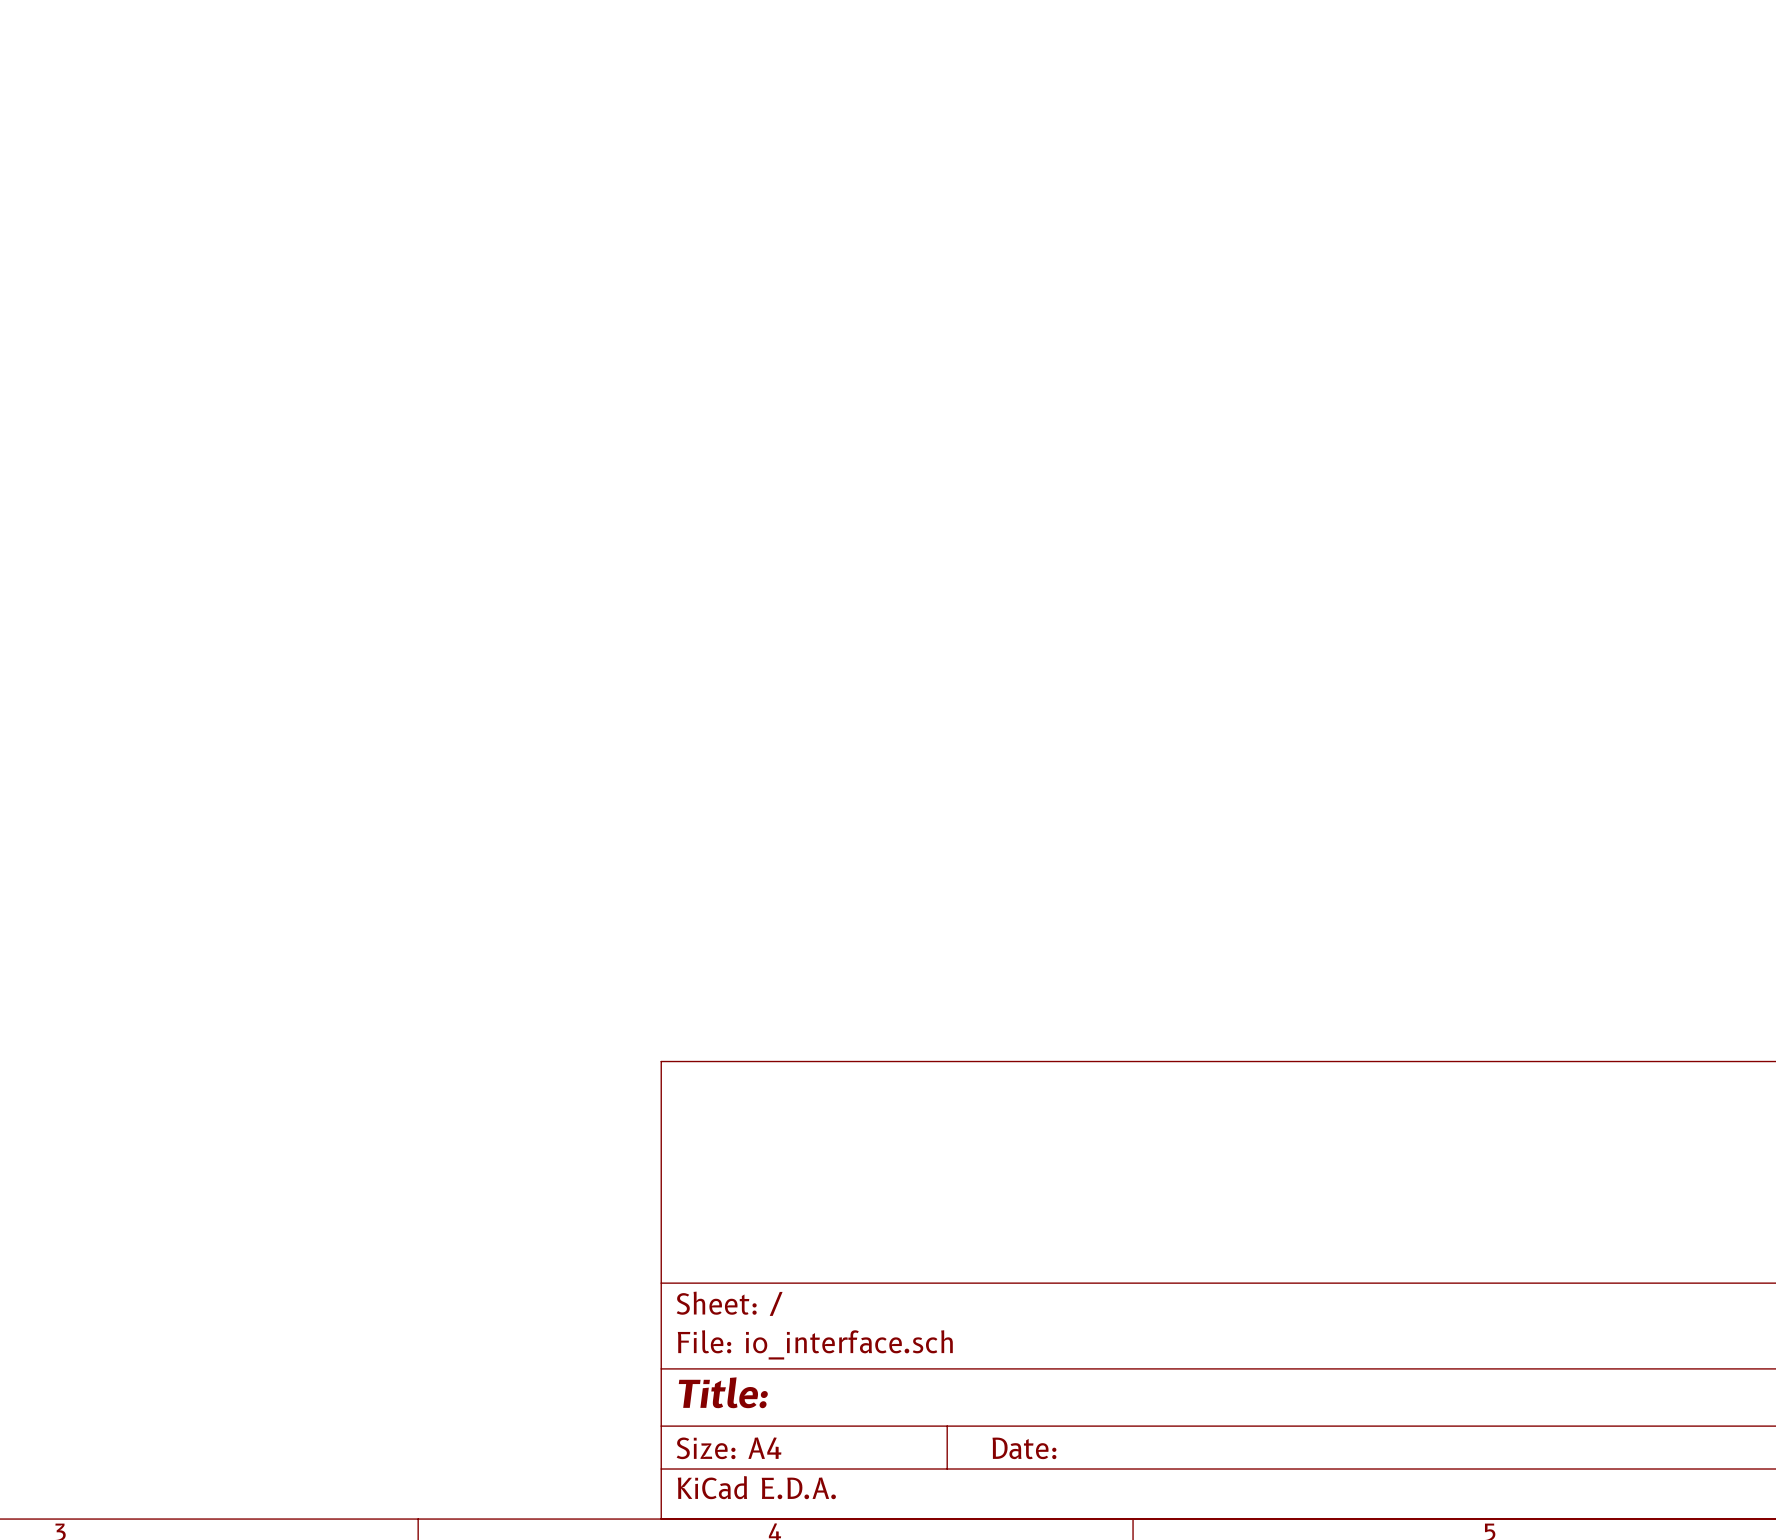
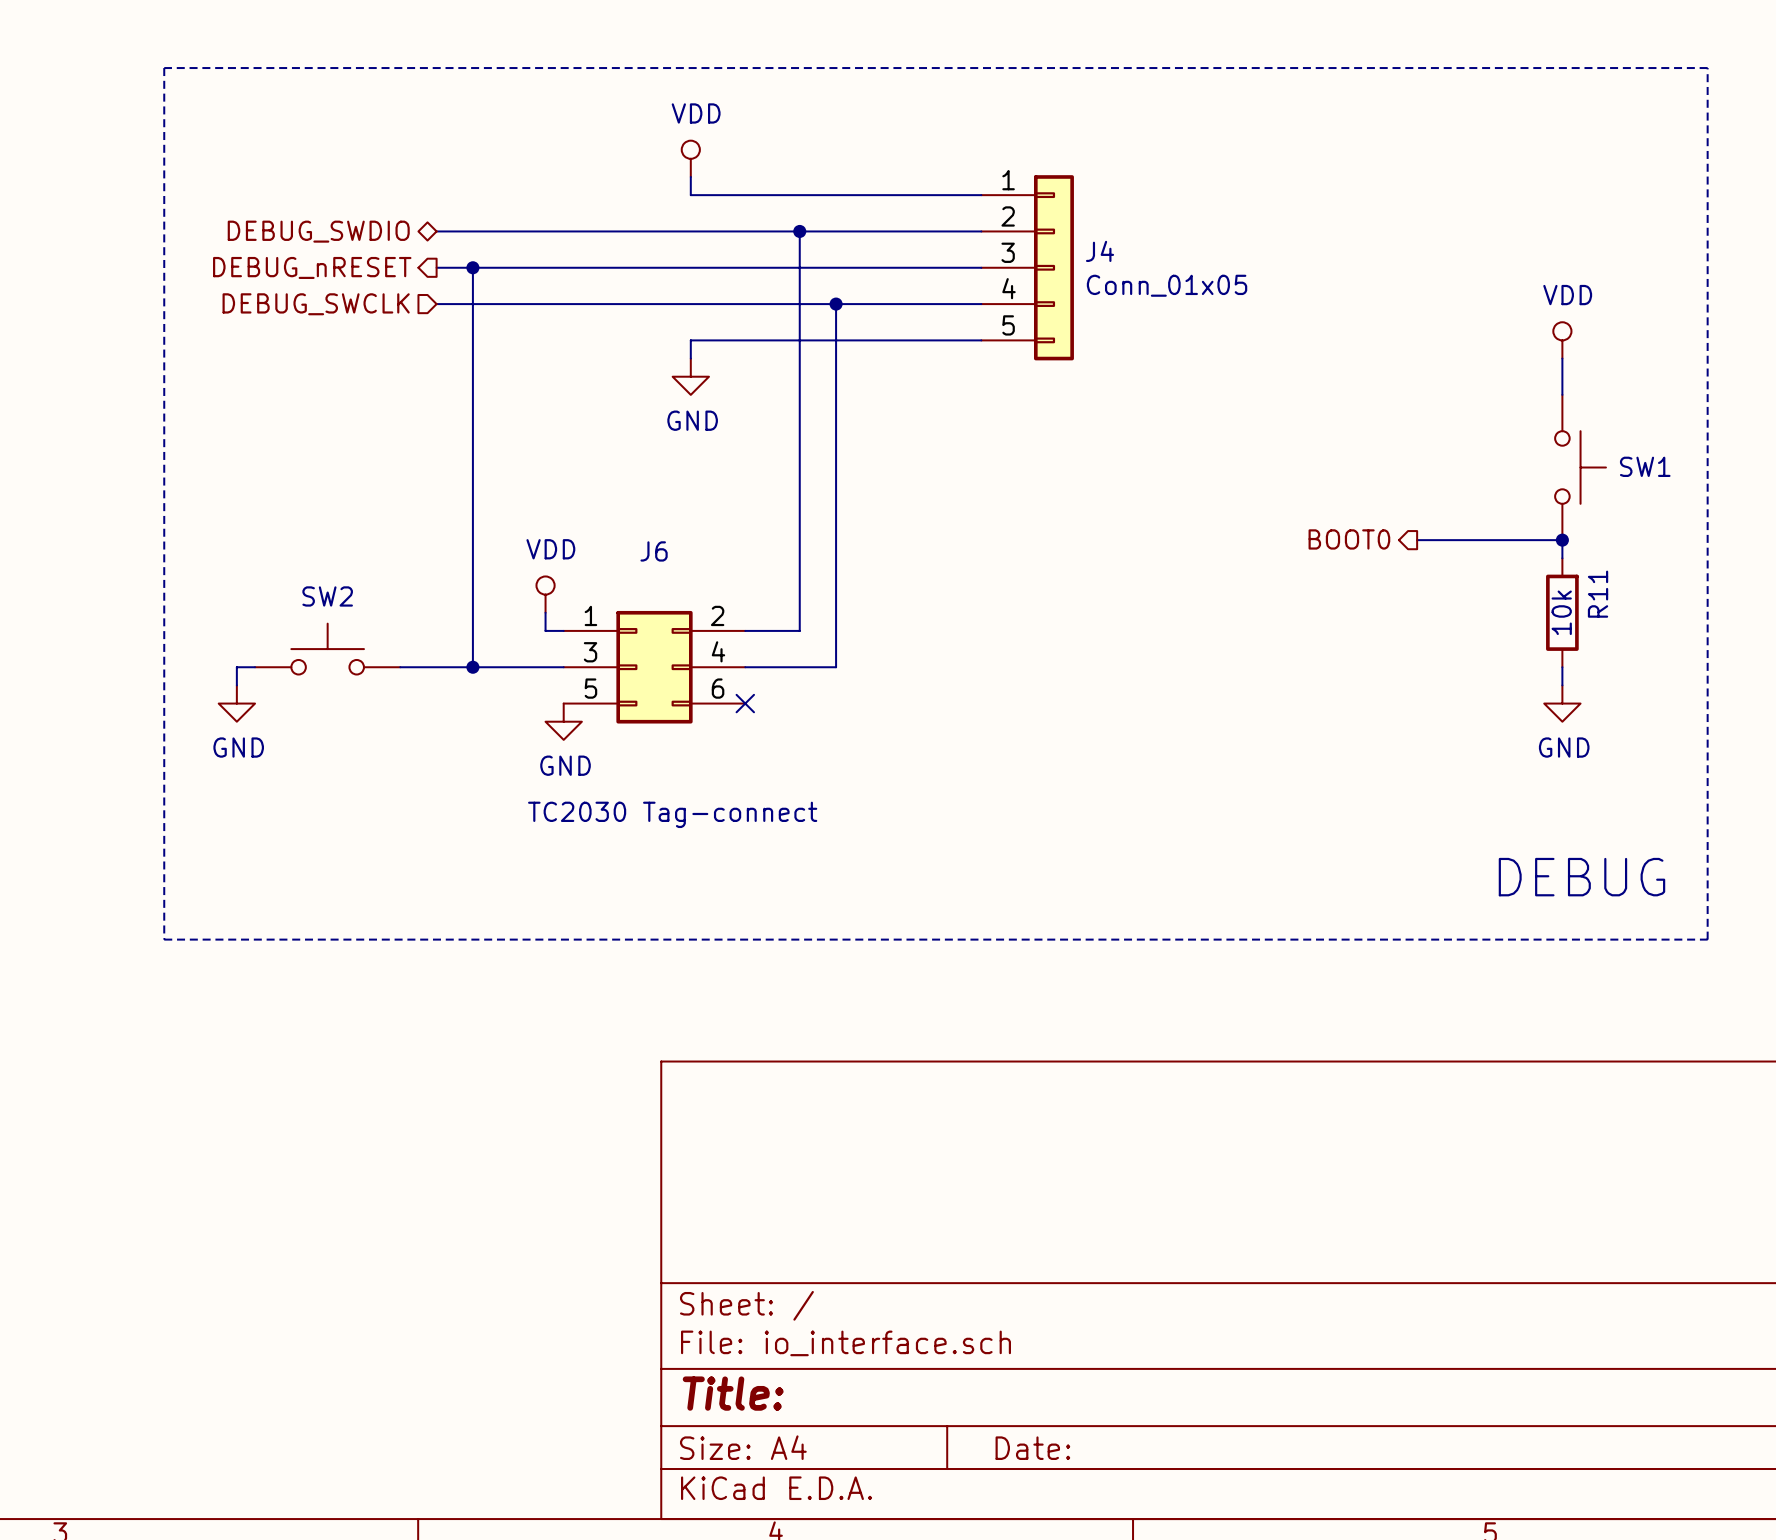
line: none -> (164, 68) (164, 939) (1707, 939) (1707, 68) (164, 68)
power symbol: none -> VDD (690, 158)
wire: none -> (690, 176) (690, 195) (981, 195)
wire: none -> (436, 231) (981, 231)
wire: none -> (799, 231) (799, 630) (745, 630)
junction: none -> (799, 231)
hierarchical label: none -> DEBUG_SWDIO (318, 231)
wire: none -> (436, 267) (981, 267)
wire: none -> (472, 267) (472, 667)
junction: none -> (472, 267)
J4: none -> Conn_01x05 (1027, 267)
hierarchical label: none -> DEBUG_nRESET (312, 267)
wire: none -> (436, 304) (981, 304)
wire: none -> (836, 304) (836, 667) (745, 667)
junction: none -> (836, 304)
hierarchical label: none -> DEBUG_SWCLK (316, 304)
wire: none -> (981, 340) (690, 340) (690, 358)
power symbol: none -> VDD (1562, 340)
wire: none -> (1562, 358) (1562, 394)
power symbol: none -> GND (690, 376)
SW1: none -> (1580, 467)
hierarchical label: none -> BOOT0 (1349, 539)
wire: none -> (1417, 540) (1562, 540) (1562, 558)
junction: none -> (1562, 540)
power symbol: none -> VDD (545, 594)
wire: none -> (545, 612) (545, 630) (563, 630)
R11: none -> 10k (1562, 612)
SW2: none -> (327, 649)
wire: none -> (255, 667) (236, 667) (236, 685)
wire: none -> (400, 667) (563, 667)
junction: none -> (472, 667)
J6: none -> TC2030 Tag-connect (654, 667)
wire: none -> (1562, 667) (1562, 685)
power symbol: none -> GND (236, 703)
no-connect mark: none -> (745, 703)
power symbol: none -> GND (1562, 703)
power symbol: none -> GND (563, 721)
text: none -> DEBUG (1581, 877)

